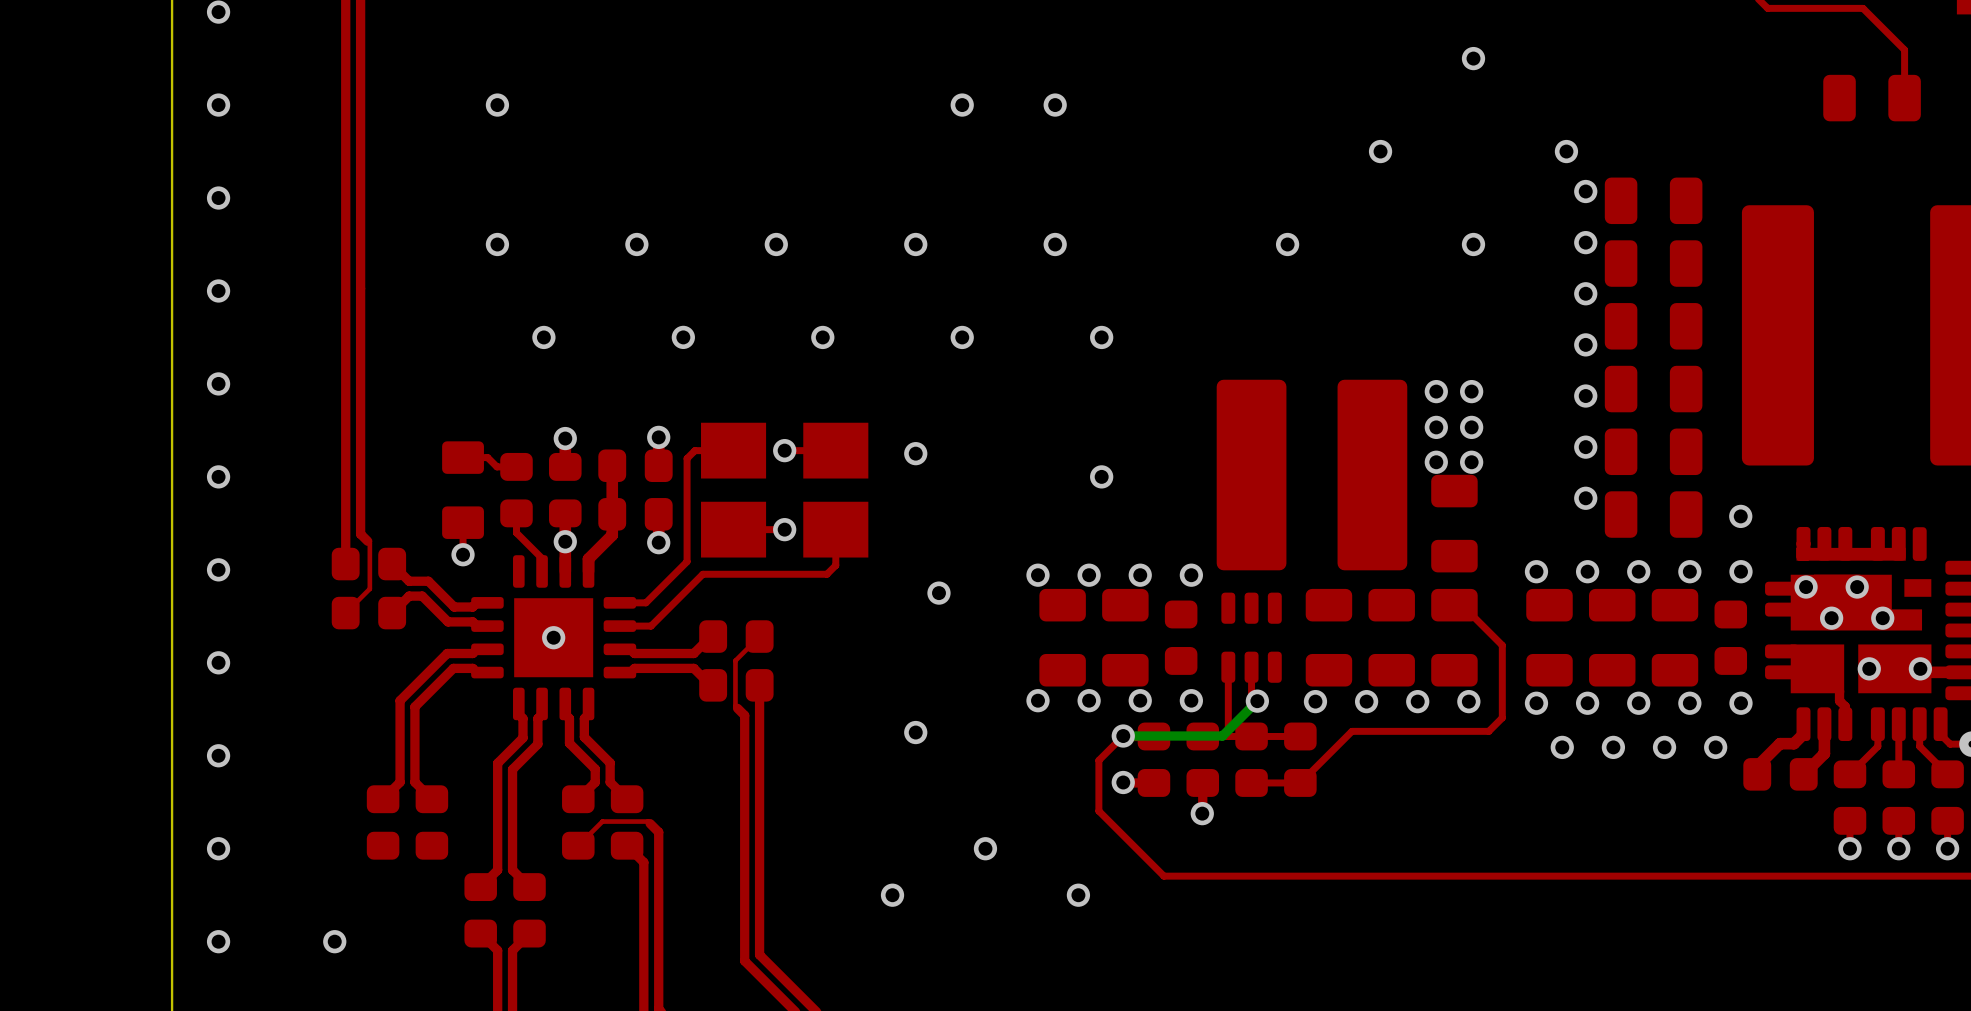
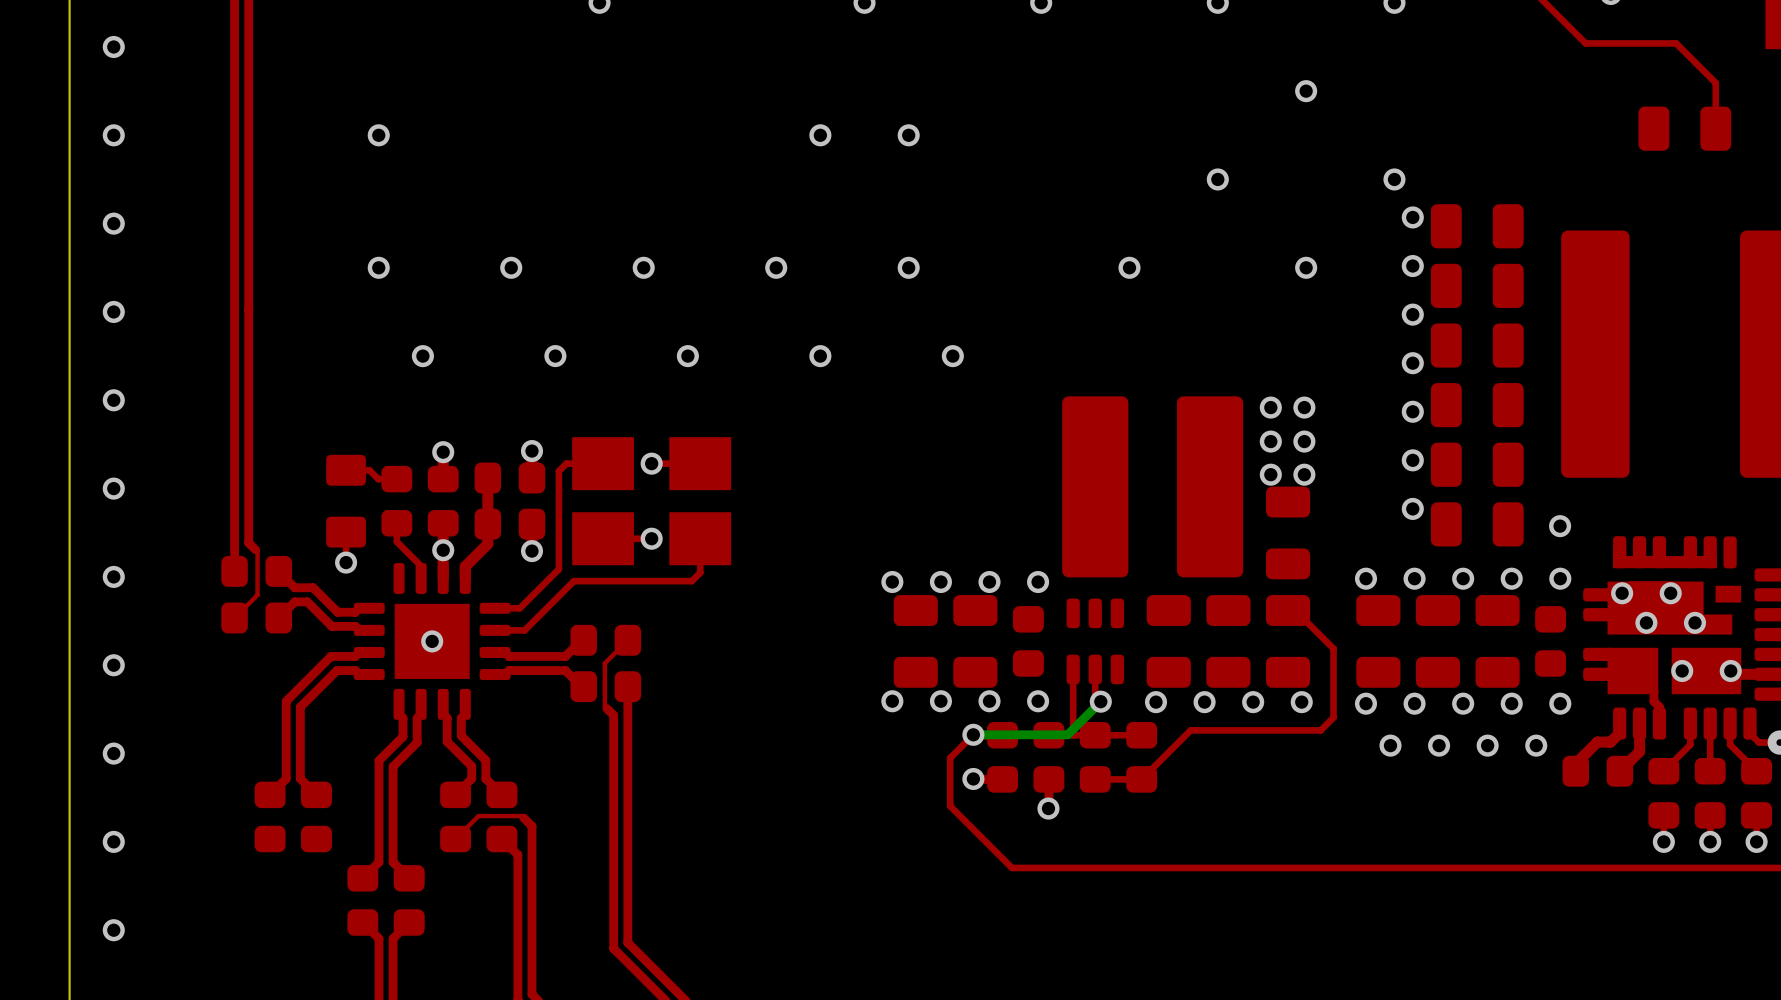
via: (915, 453) -> none
via: (1101, 476) -> none
via: (938, 593) -> none
via: (915, 732) -> none
via: (985, 848) -> none
via: (892, 895) -> none
via: (1078, 895) -> none
via: (334, 941) -> none

